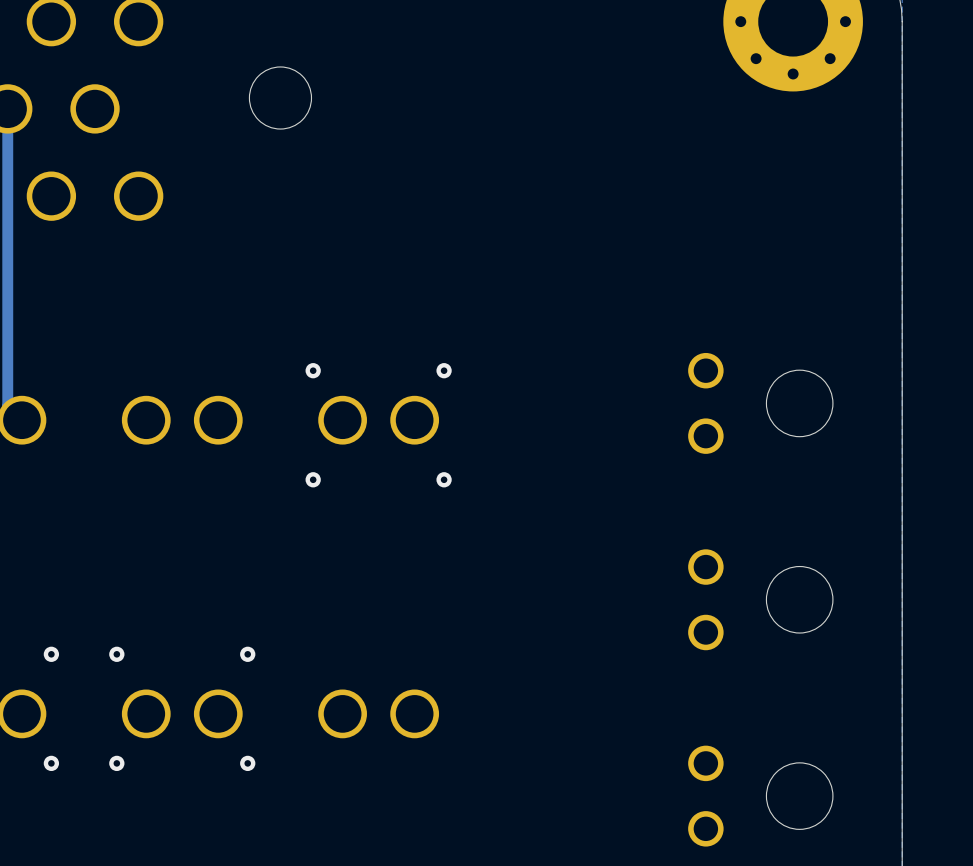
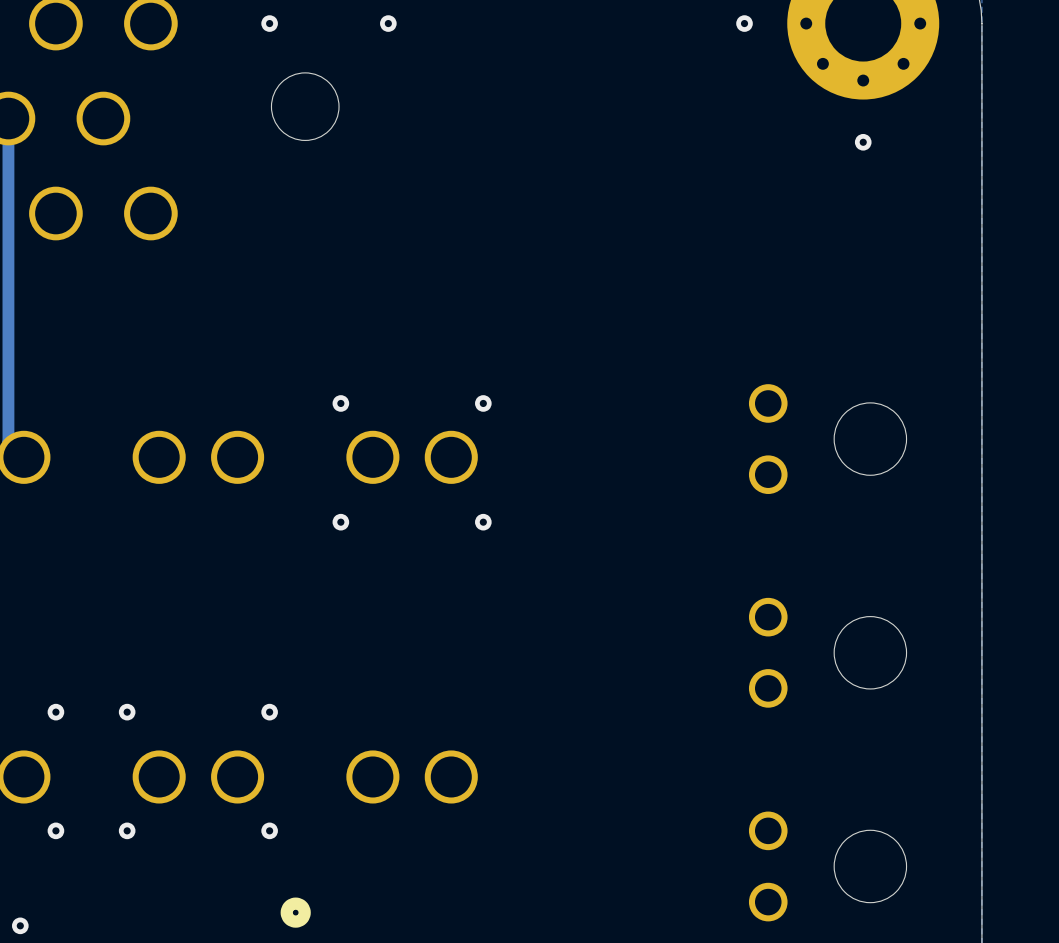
via: none -> (269, 23)
via: none -> (388, 23)
via: none -> (744, 23)
via: none -> (863, 142)
part: none -> (295, 912)
via: none -> (20, 925)

